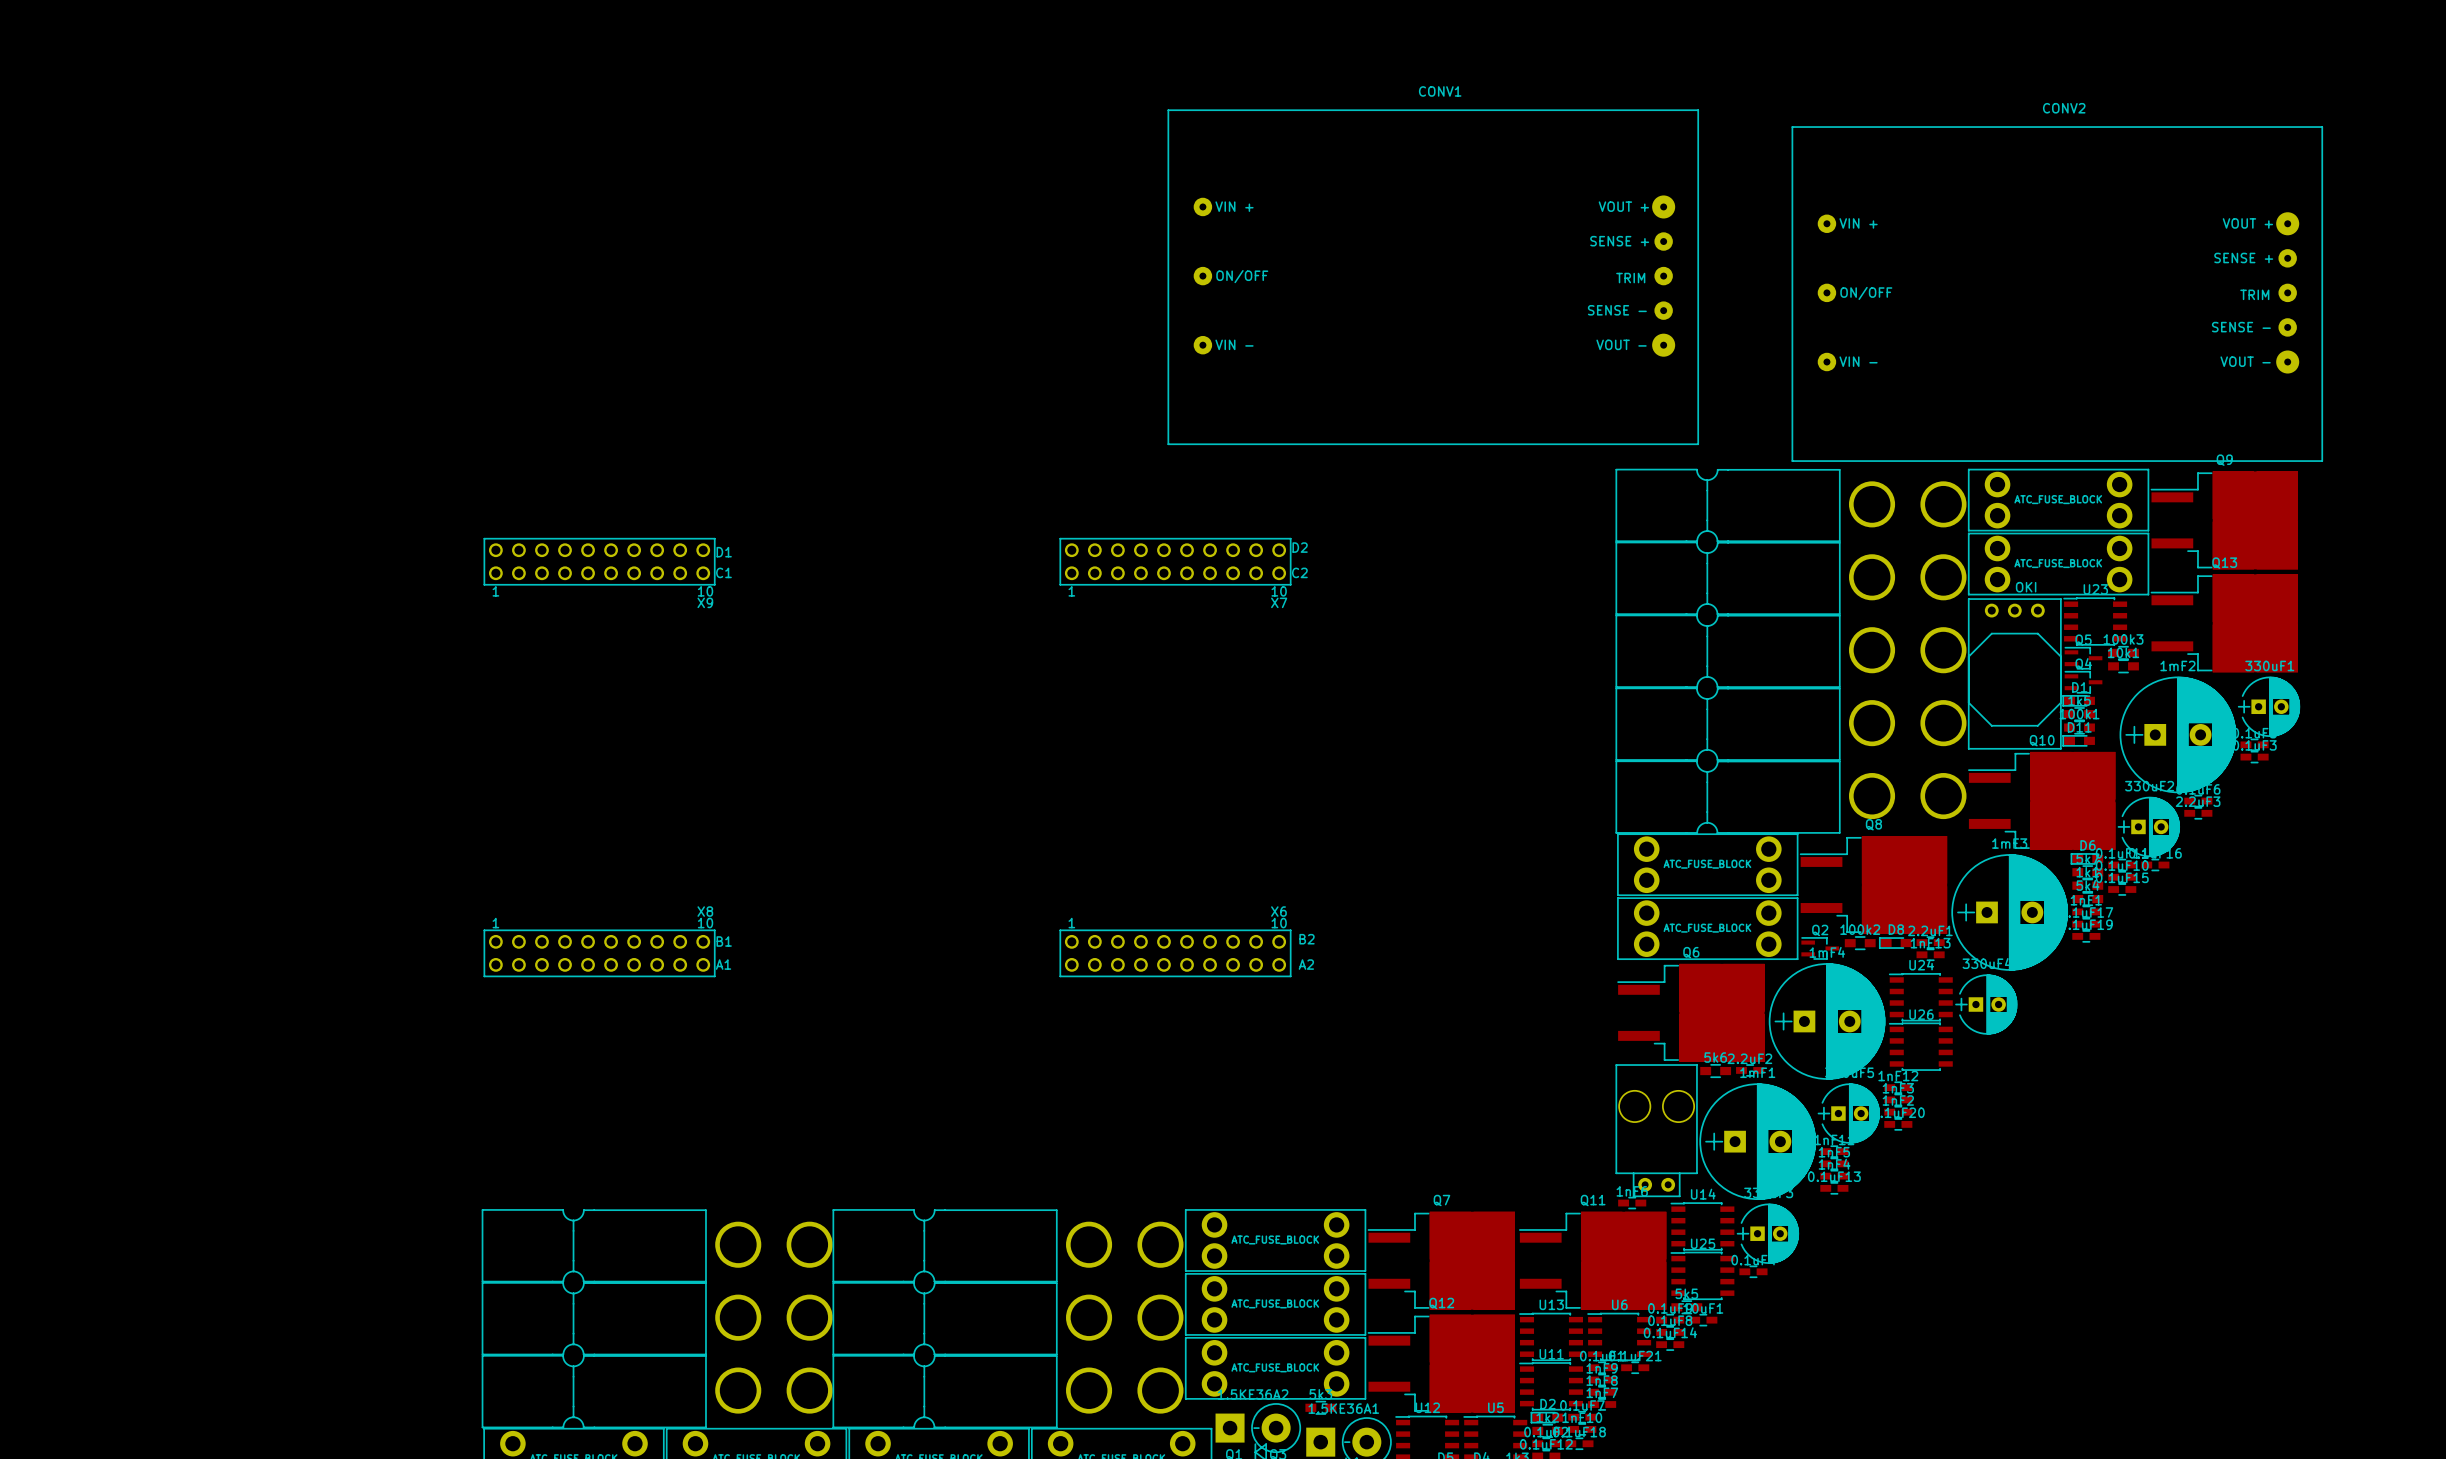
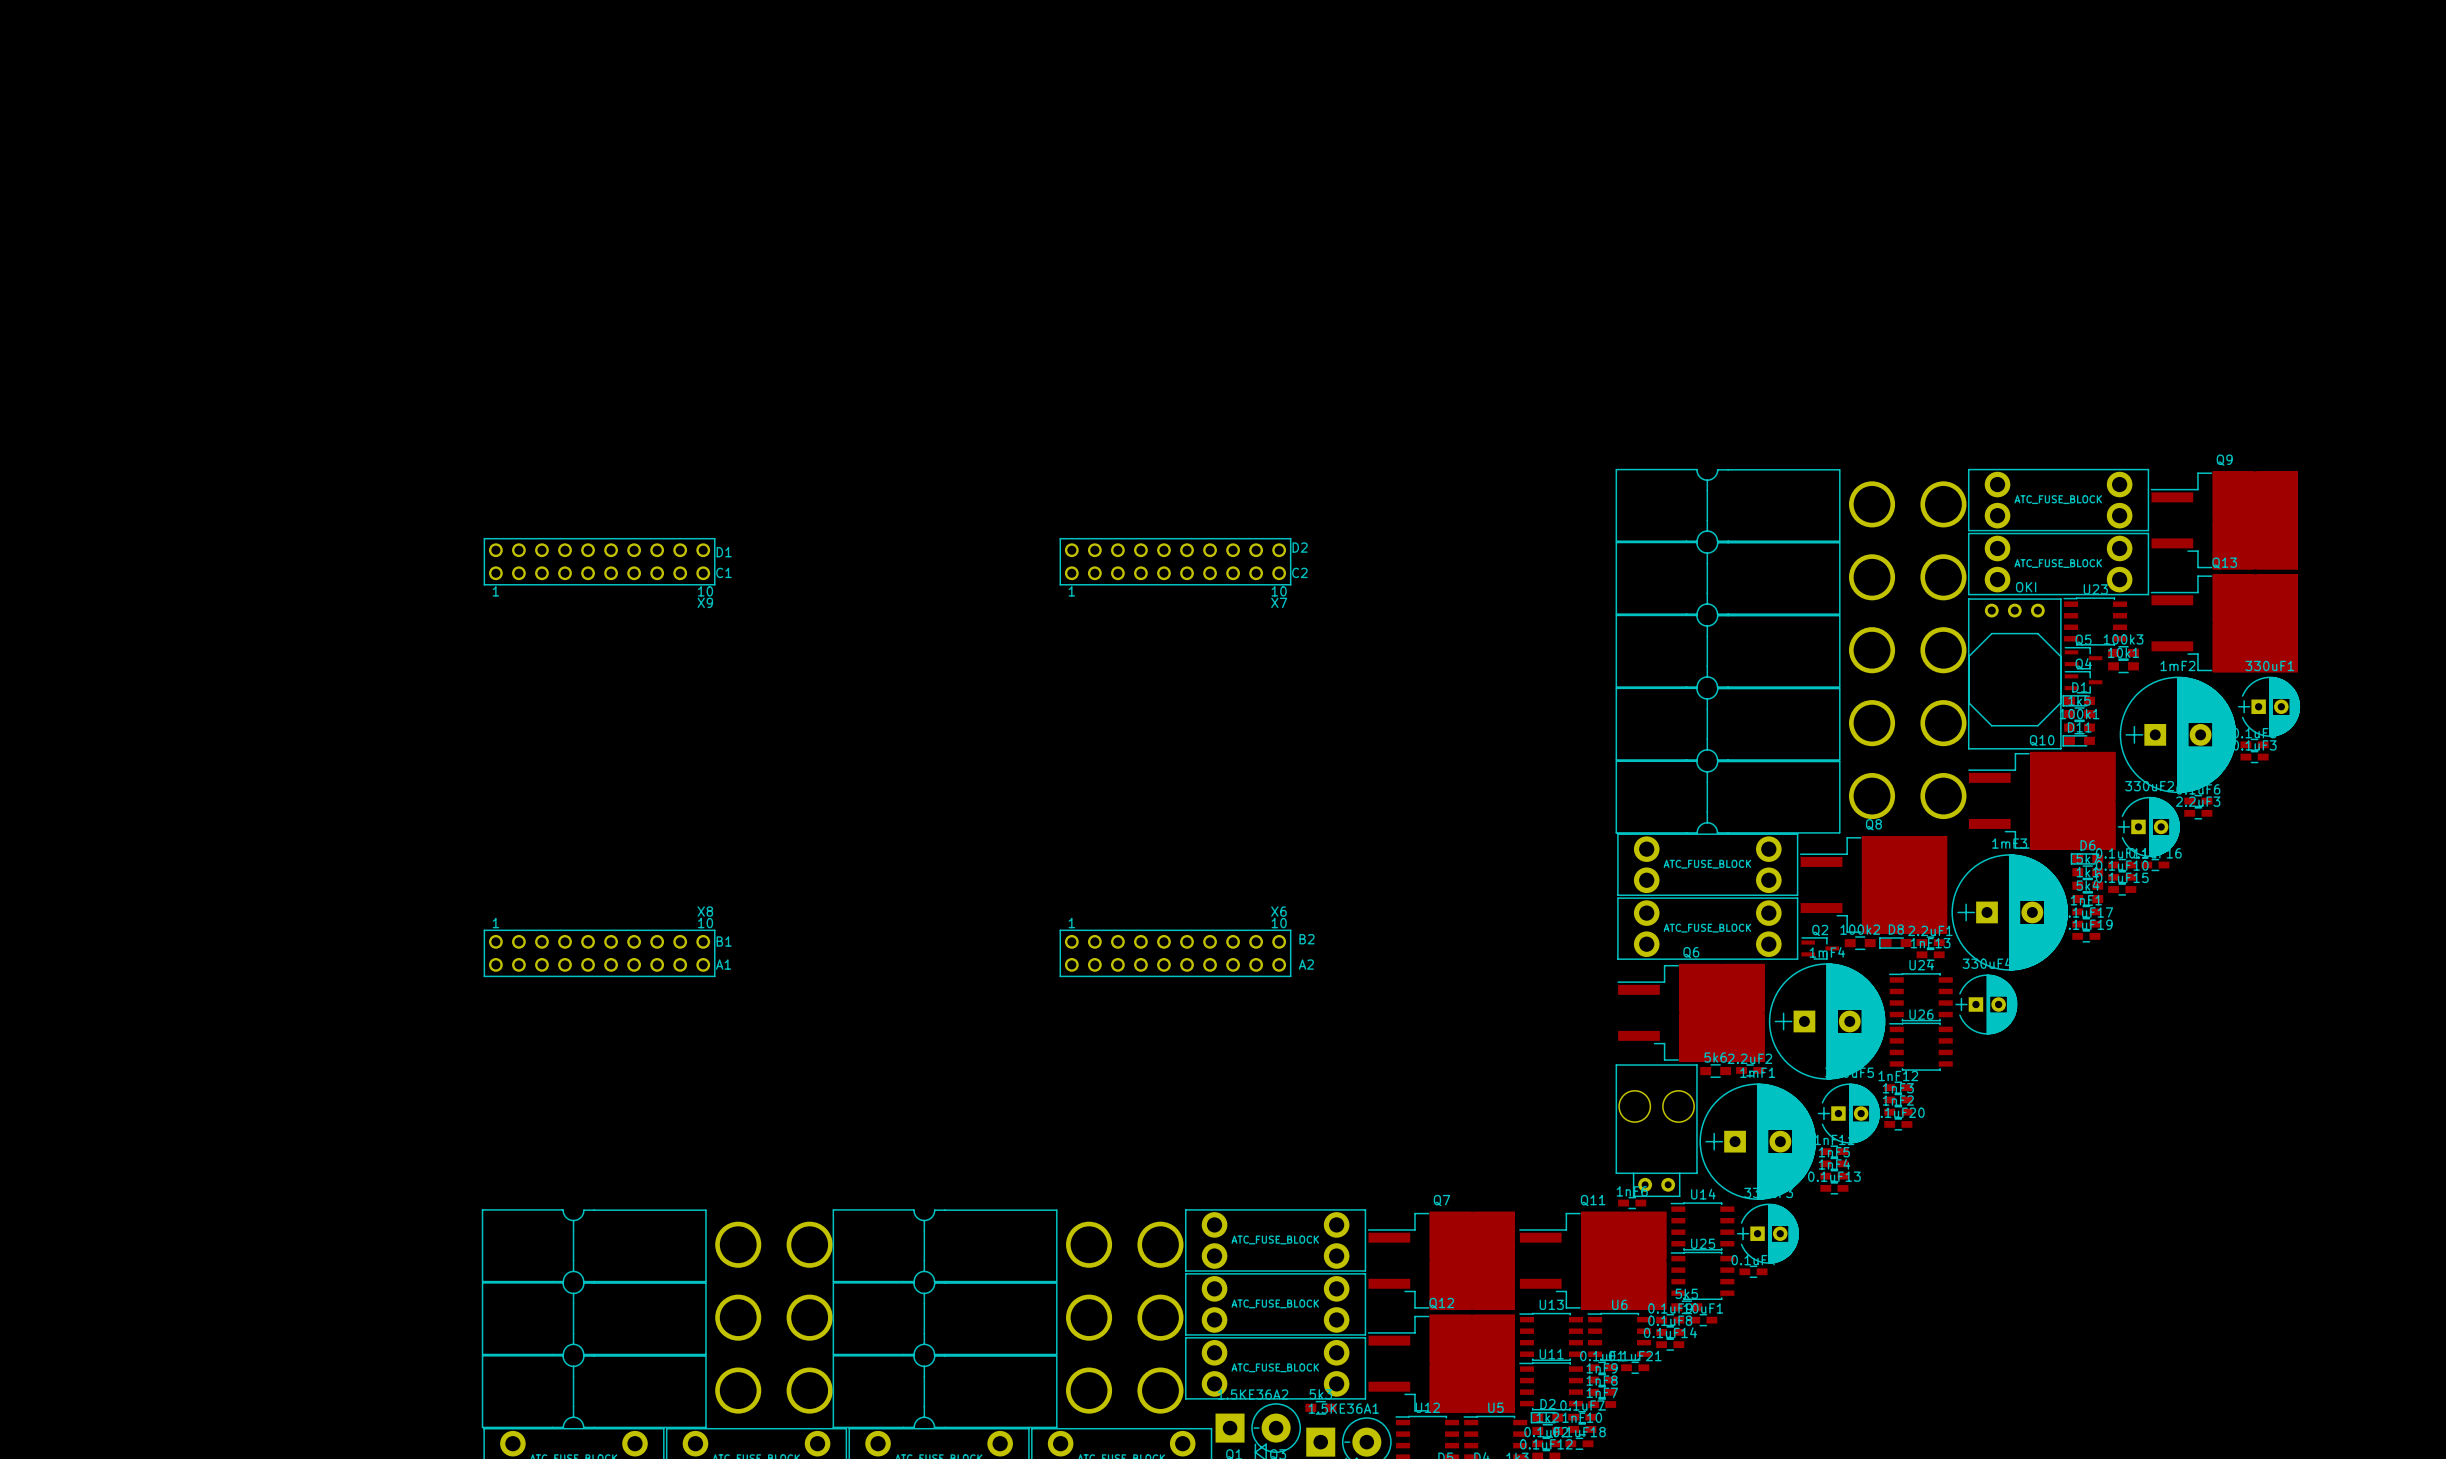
CONV1: (1433, 277) -> none
CONV2: (2057, 294) -> none

